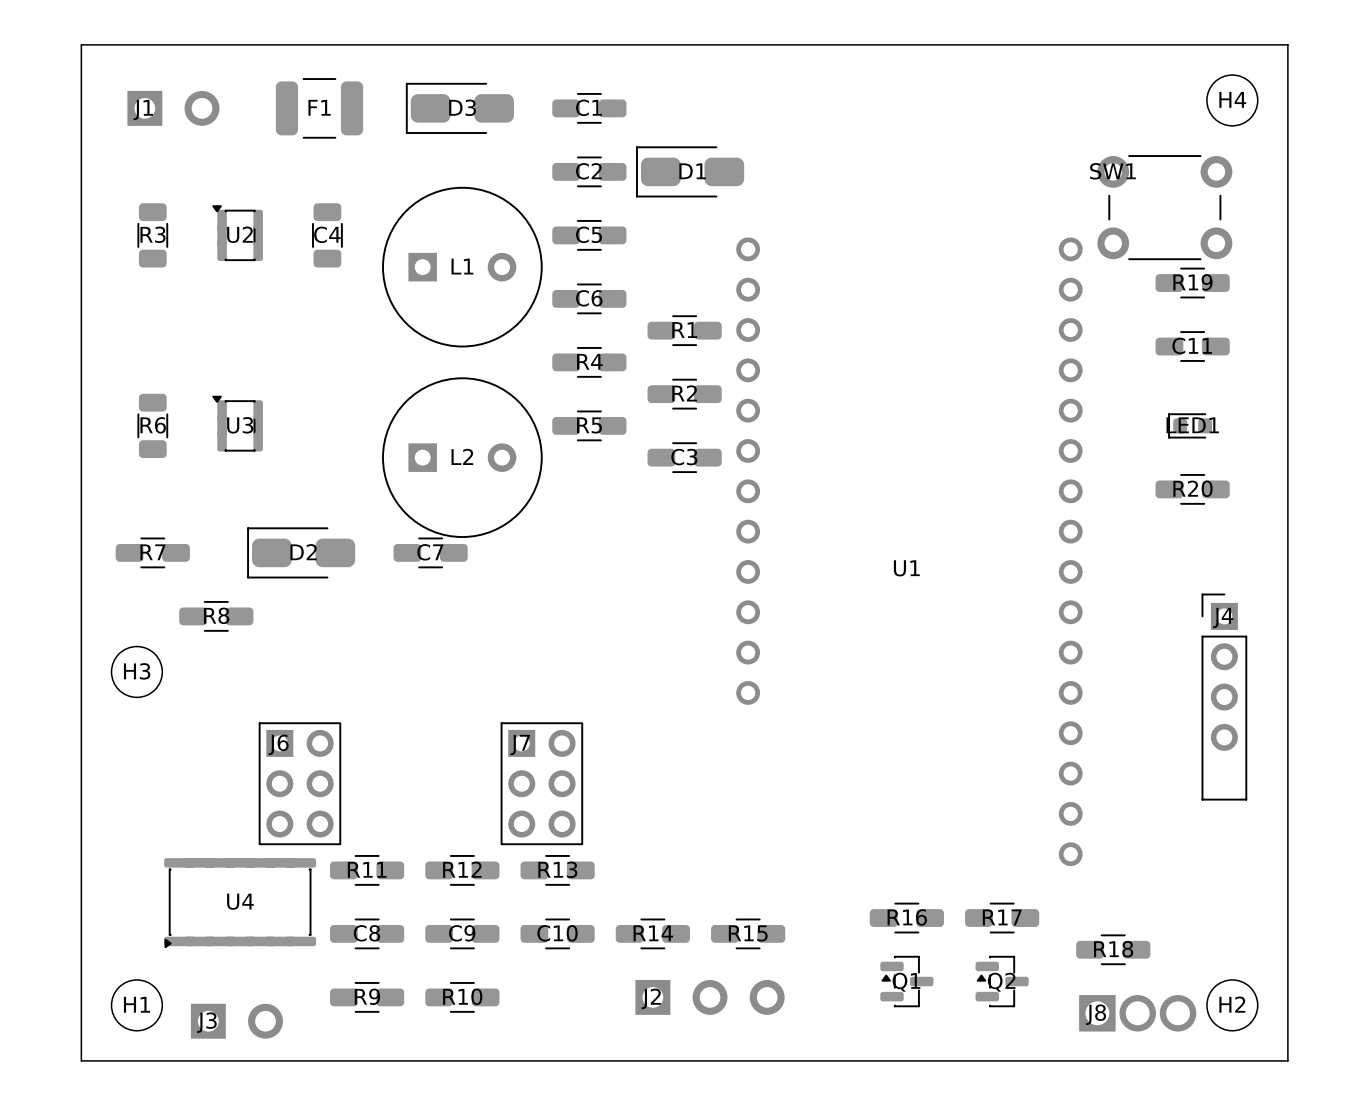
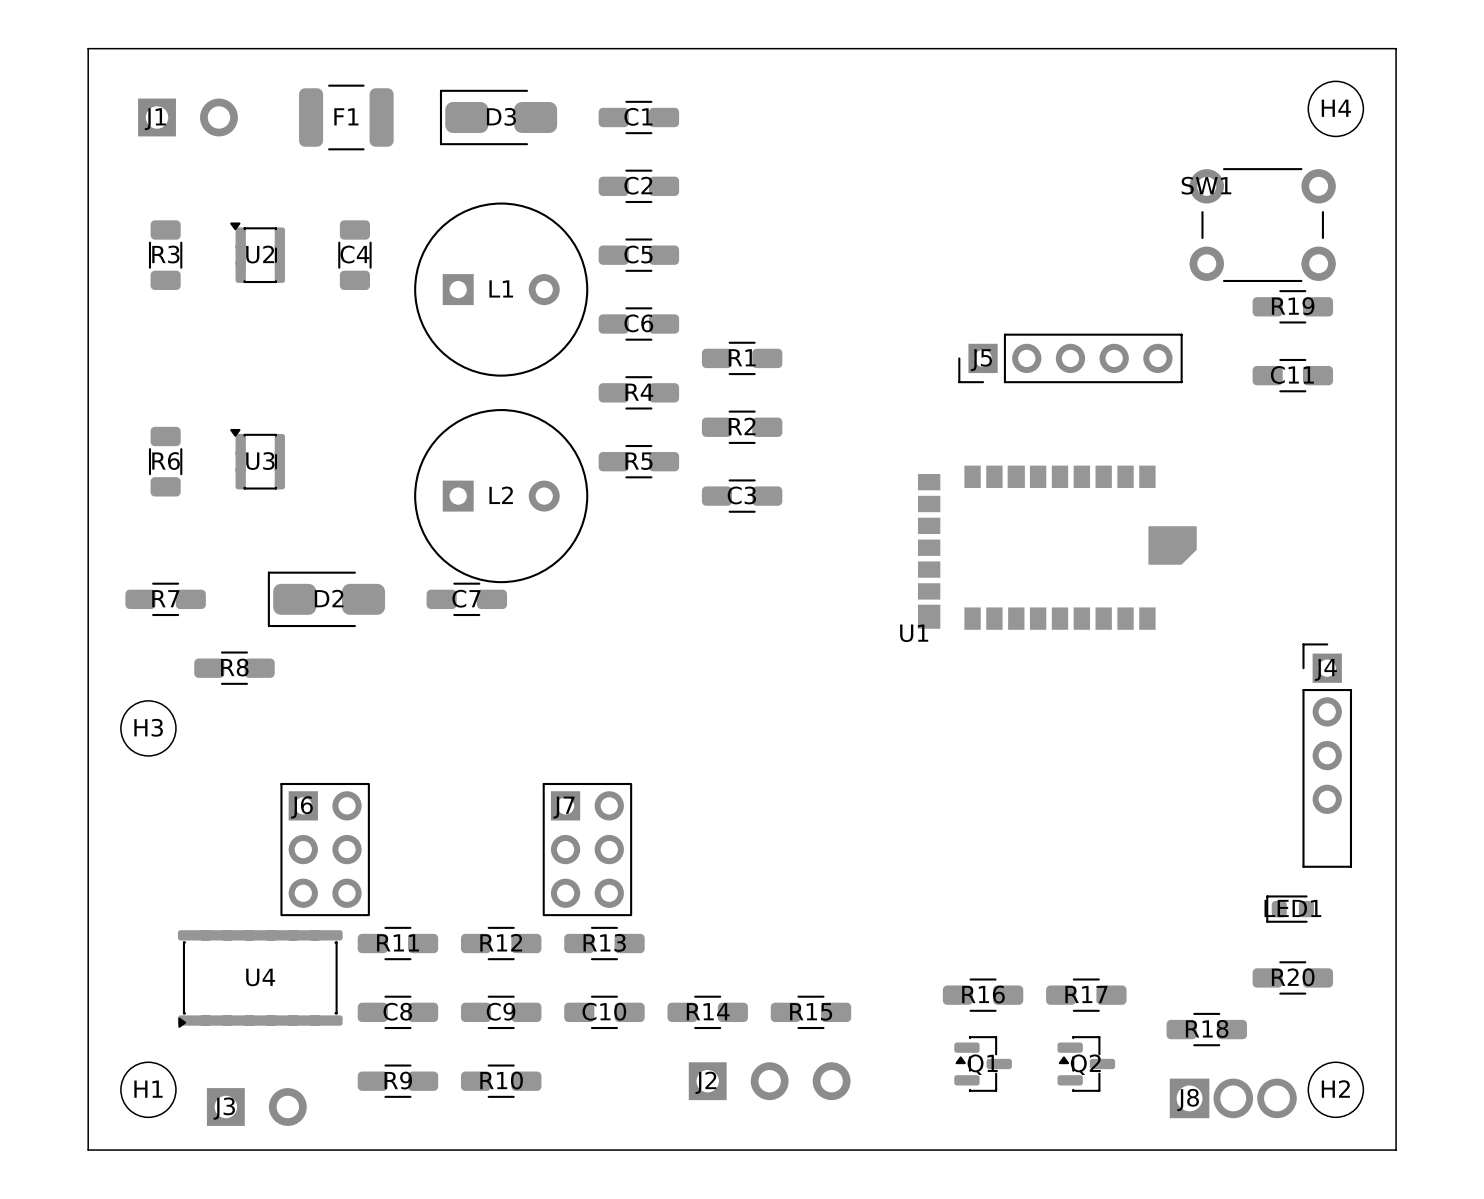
D1: (690, 171) -> none
U1 footprint: [736, 237, 1083, 867] -> [917, 465, 1197, 630]
J5: none -> (1070, 358)
LED1 position: (1190, 425) -> (1290, 909)
R20 position: (1192, 489) -> (1292, 977)
U1 name position: U1 (906, 568) -> U1 (914, 633)

